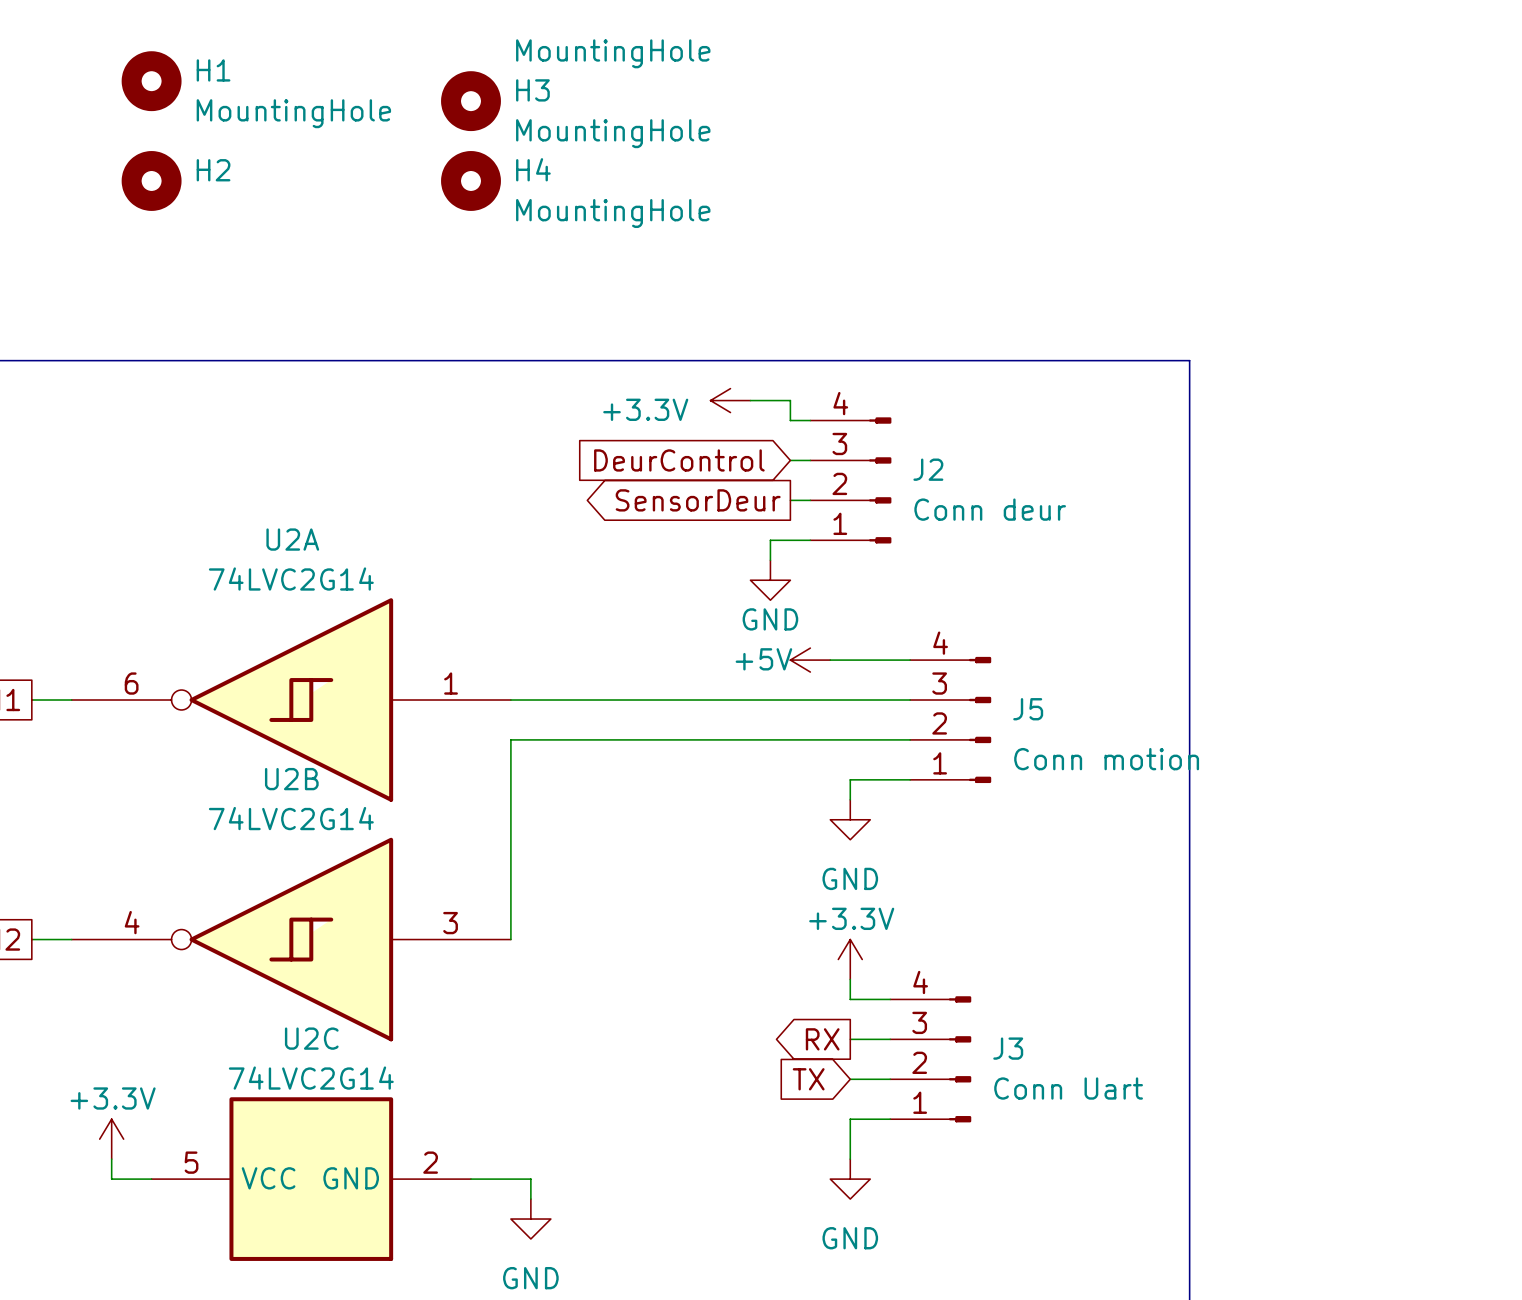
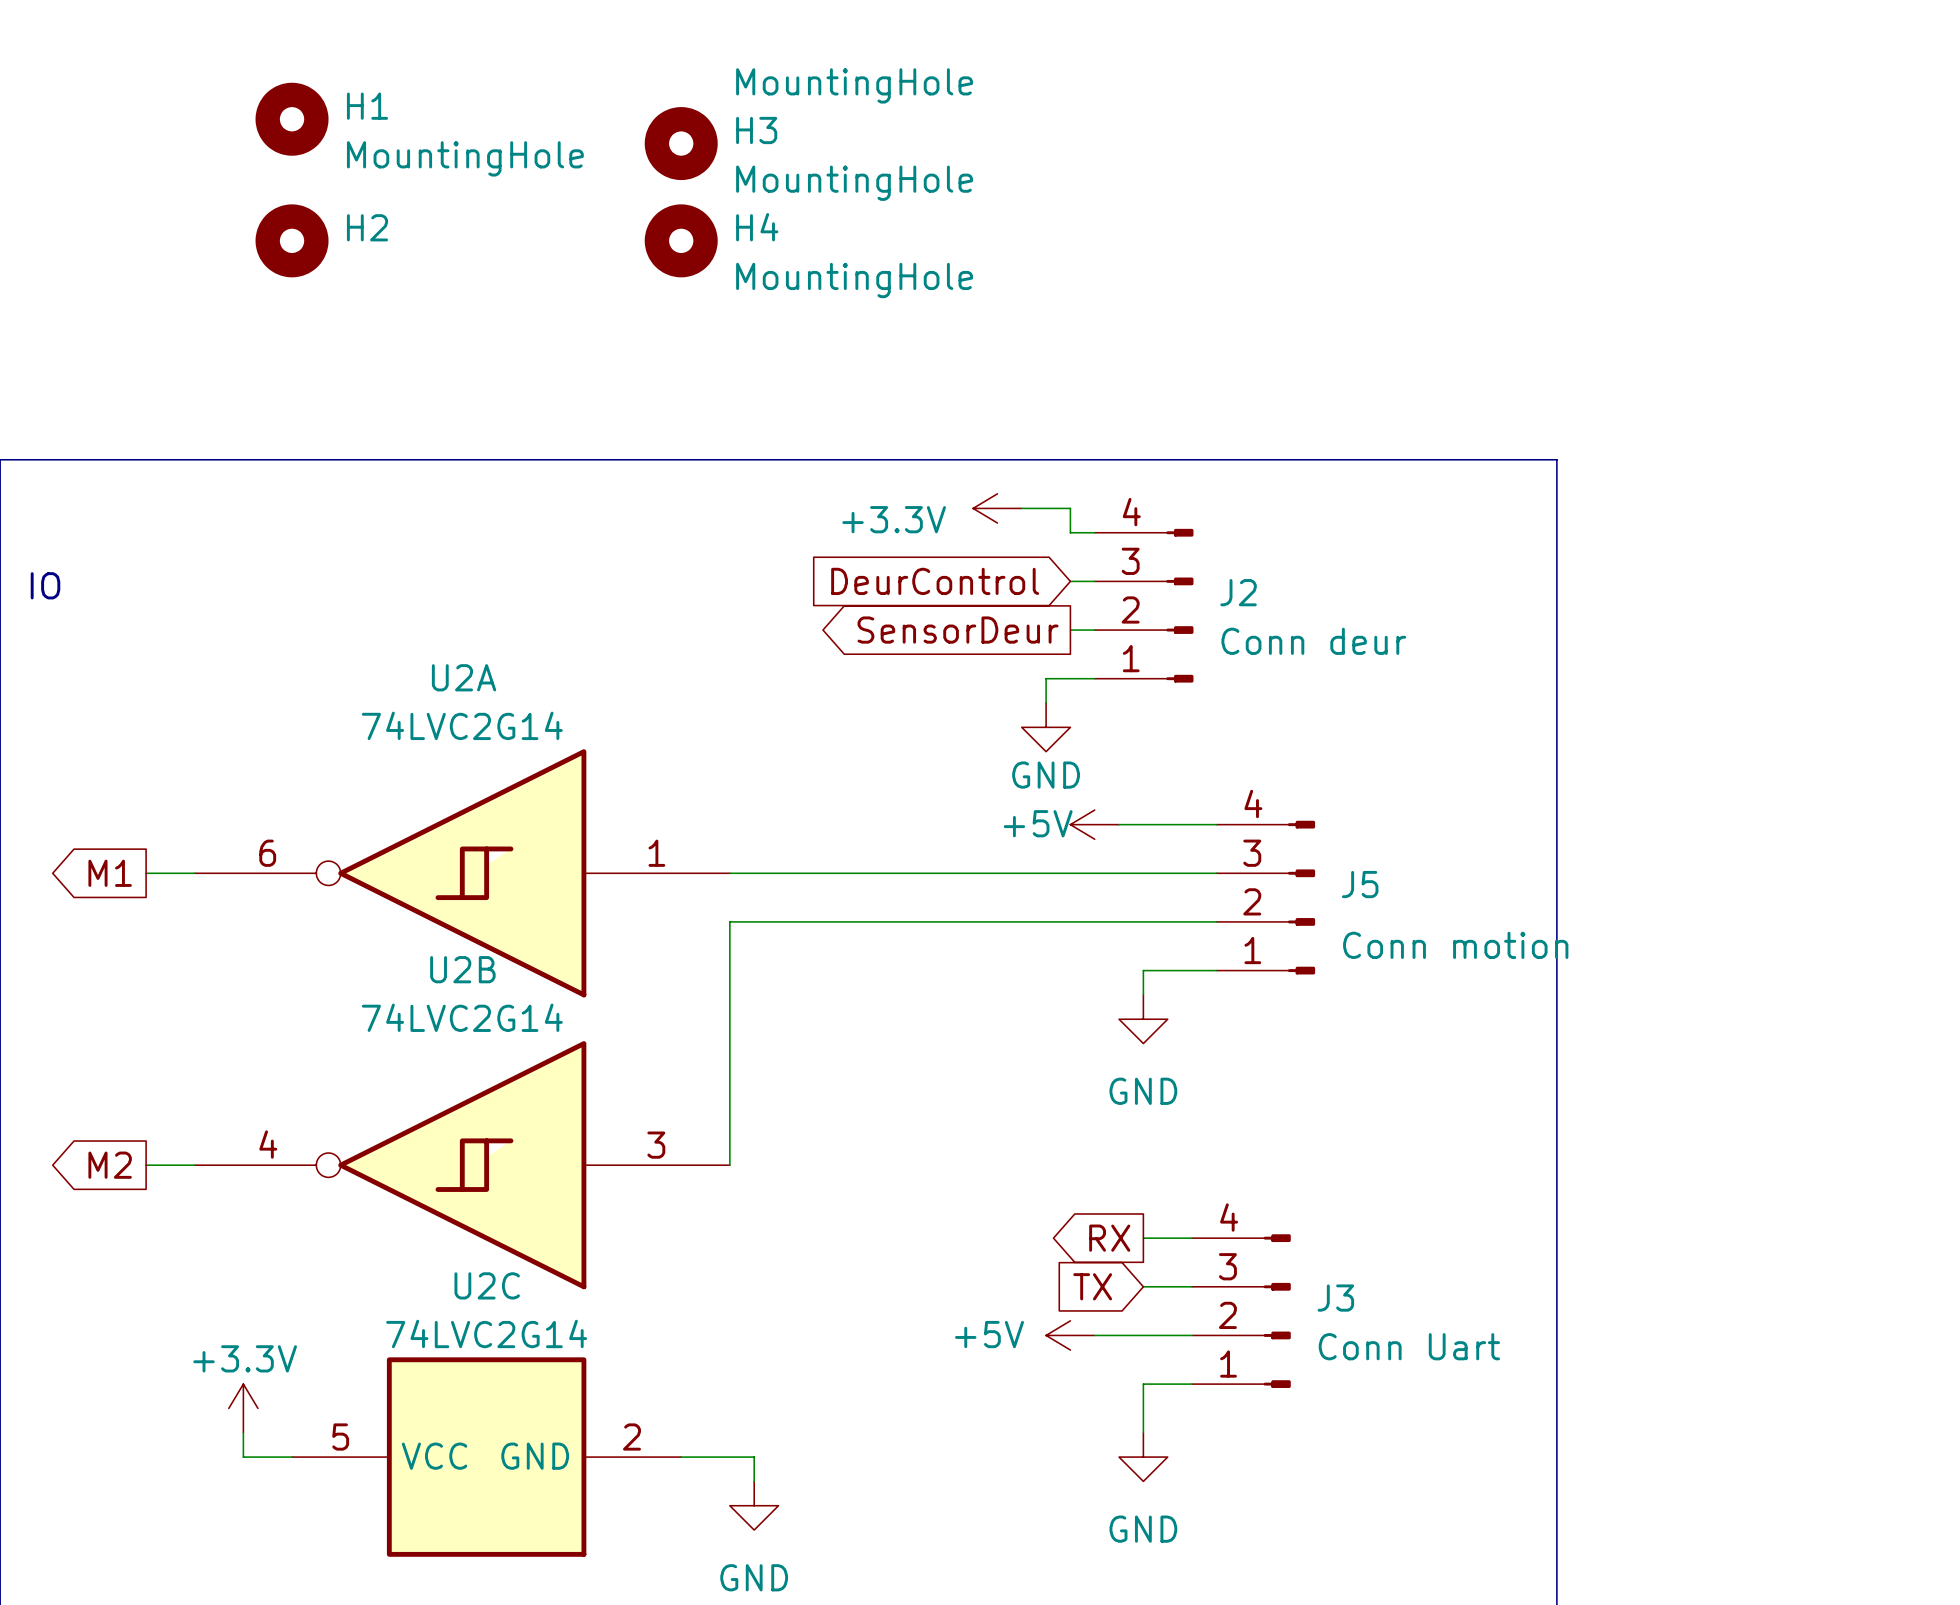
power symbol: +3.3V (850, 959) -> none
global label: none -> RX (1109, 1238)
global label shape: output (822, 1039) -> input (1092, 1286)
global label: RX (822, 1039) -> TX (1092, 1286)
power symbol: none -> +5V (1070, 1335)
global label: TX (808, 1079) -> none
wire: none -> (1094, 1335) (1143, 1335)

